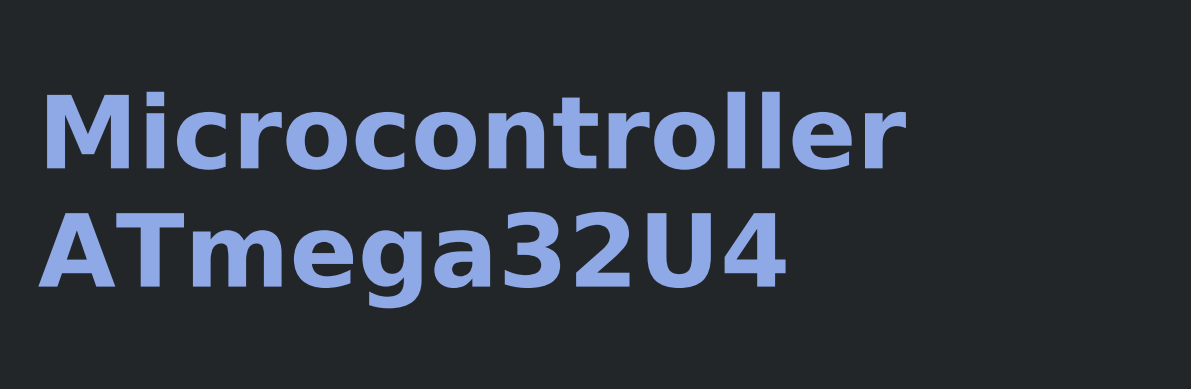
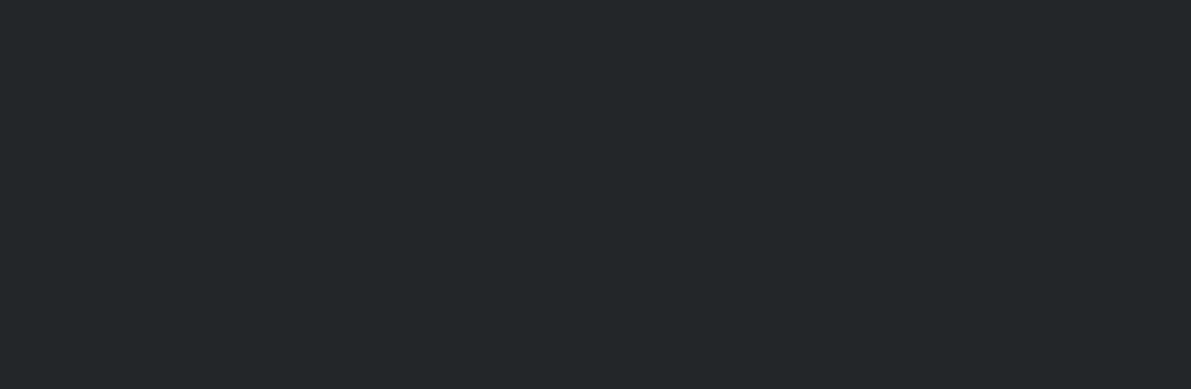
text: Microcontroller (476, 130) -> none
text: ATmega32U4 (411, 260) -> none

